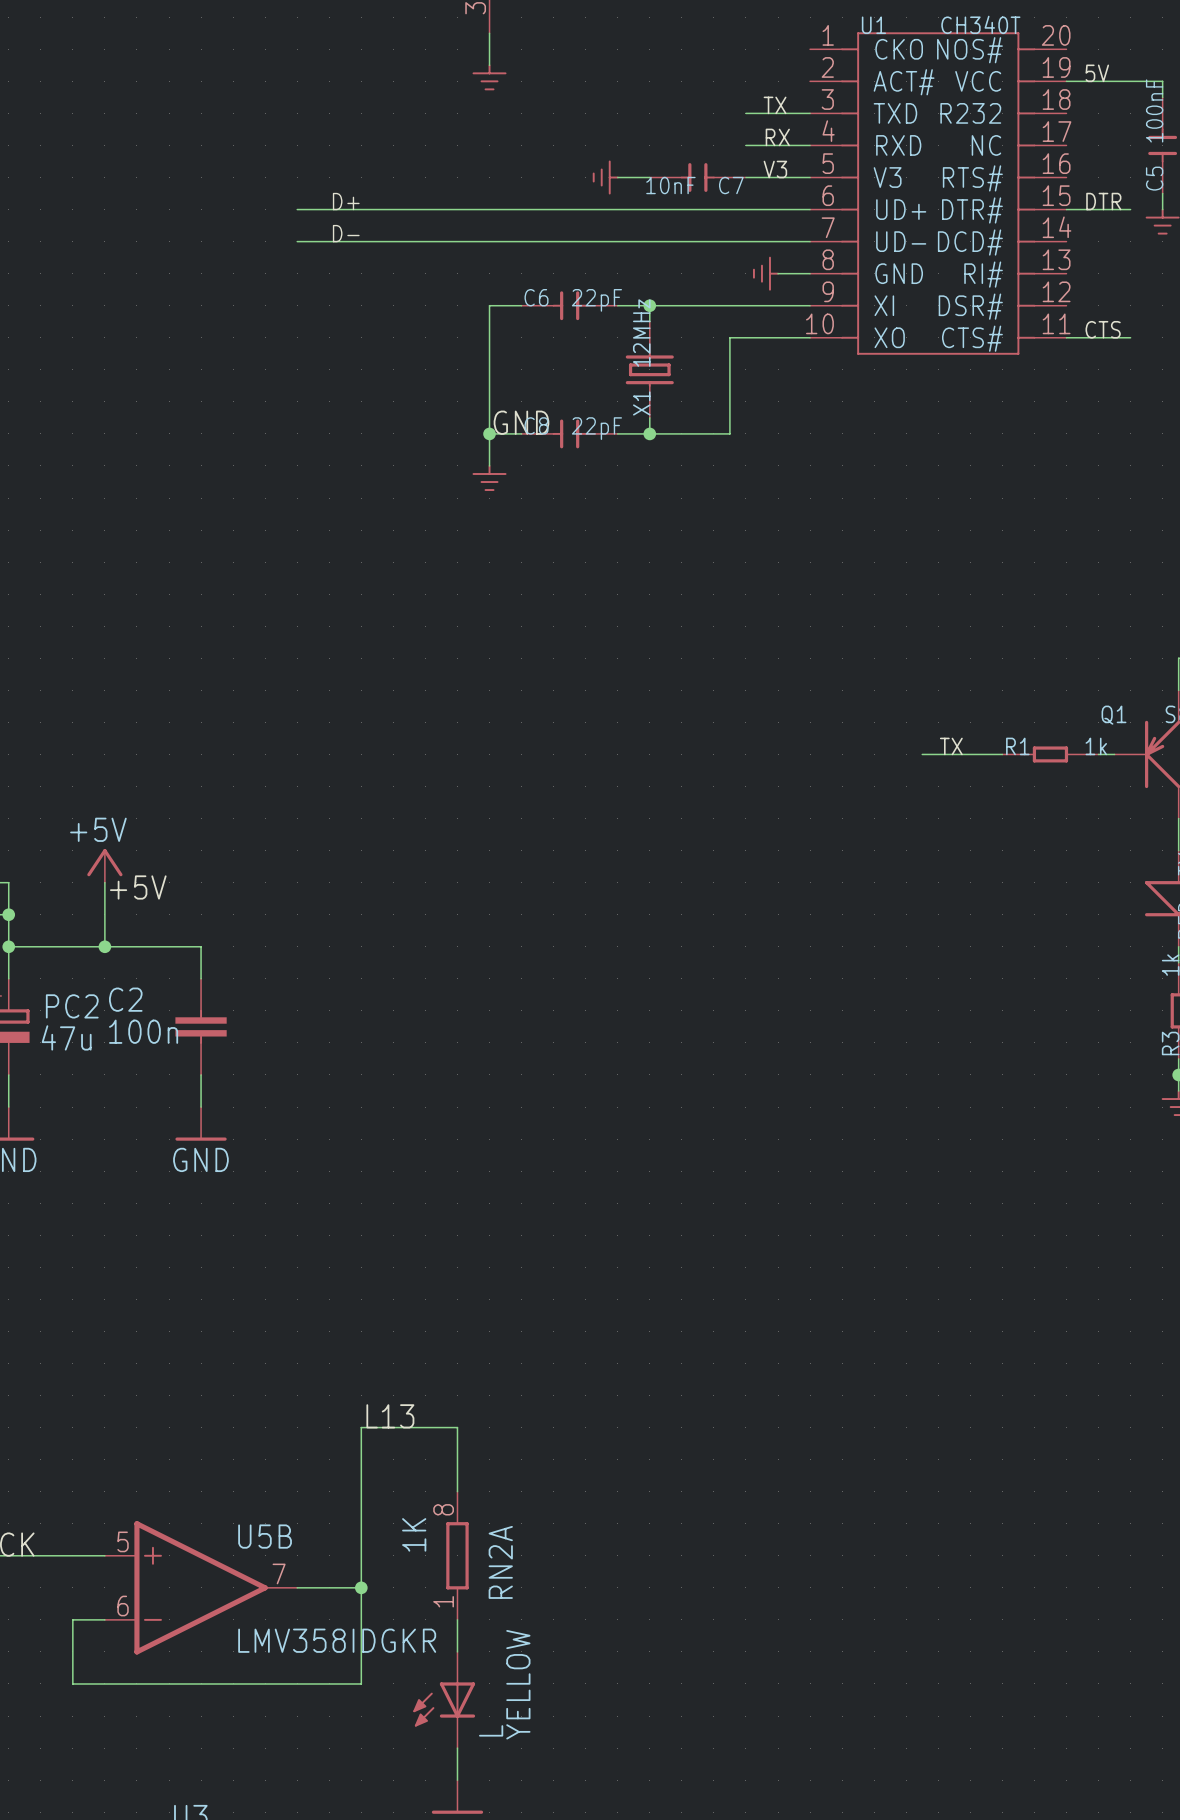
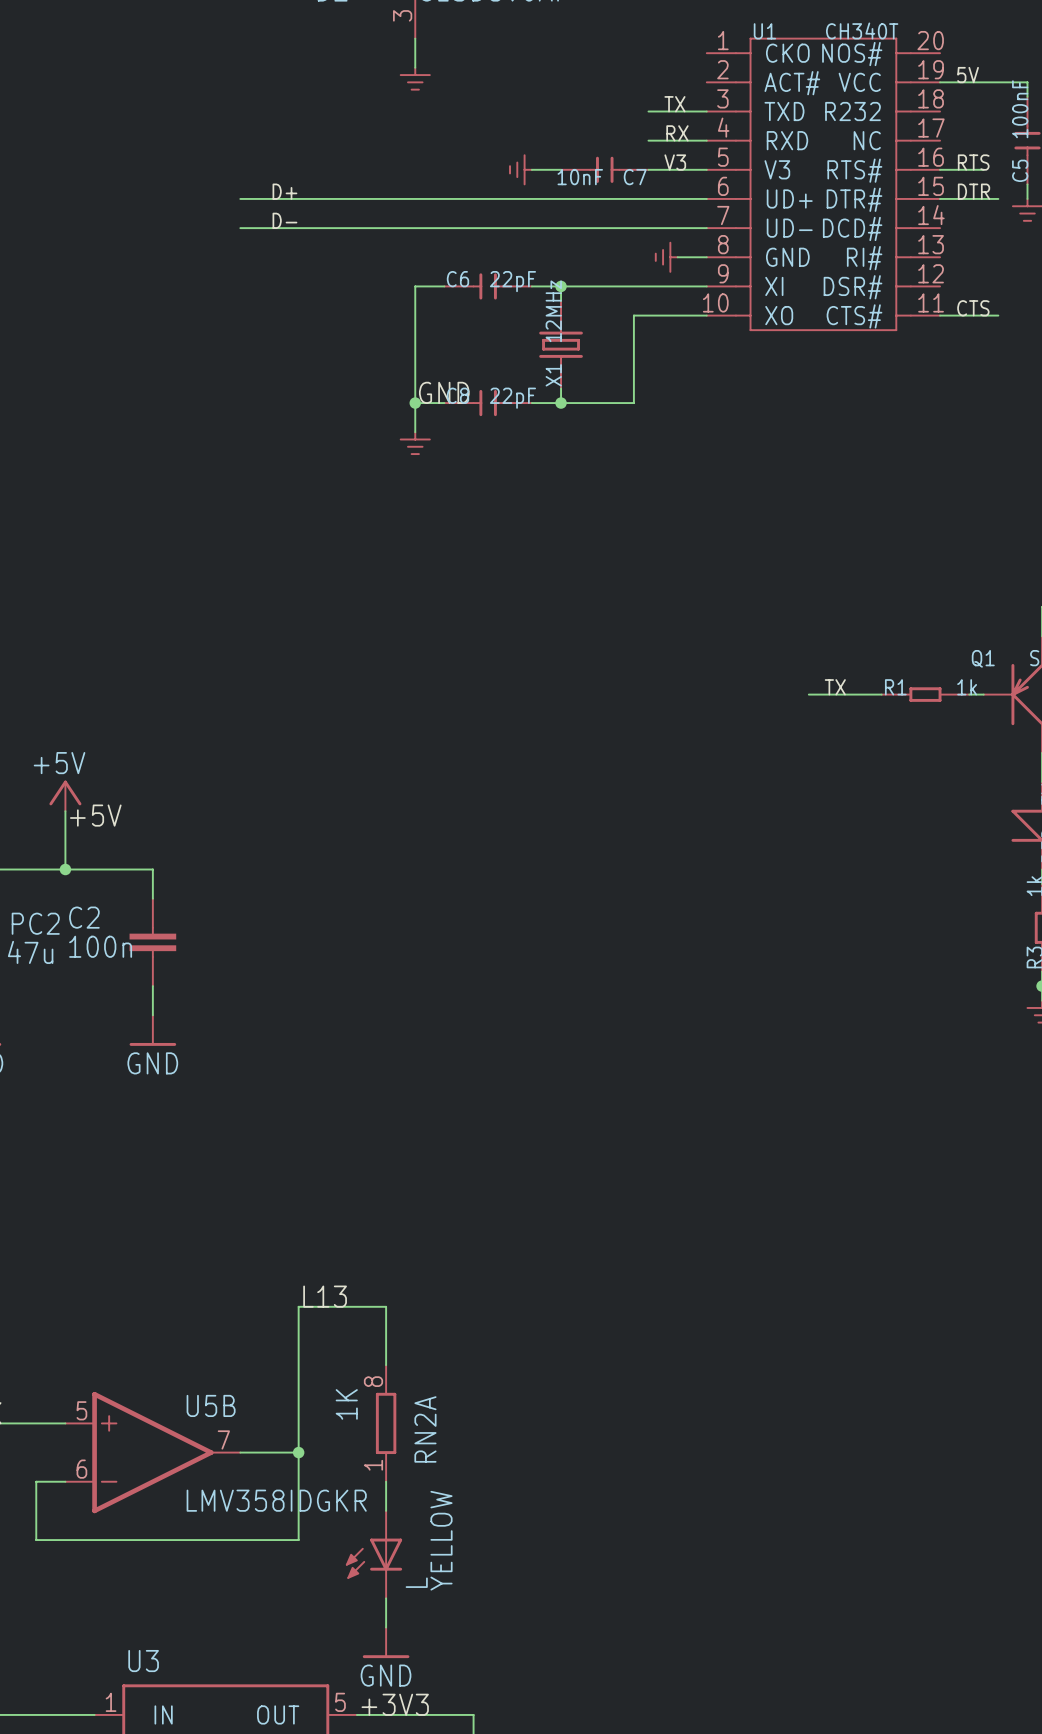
label: none -> RTS (973, 162)
wire: none -> (940, 169) (983, 169)

